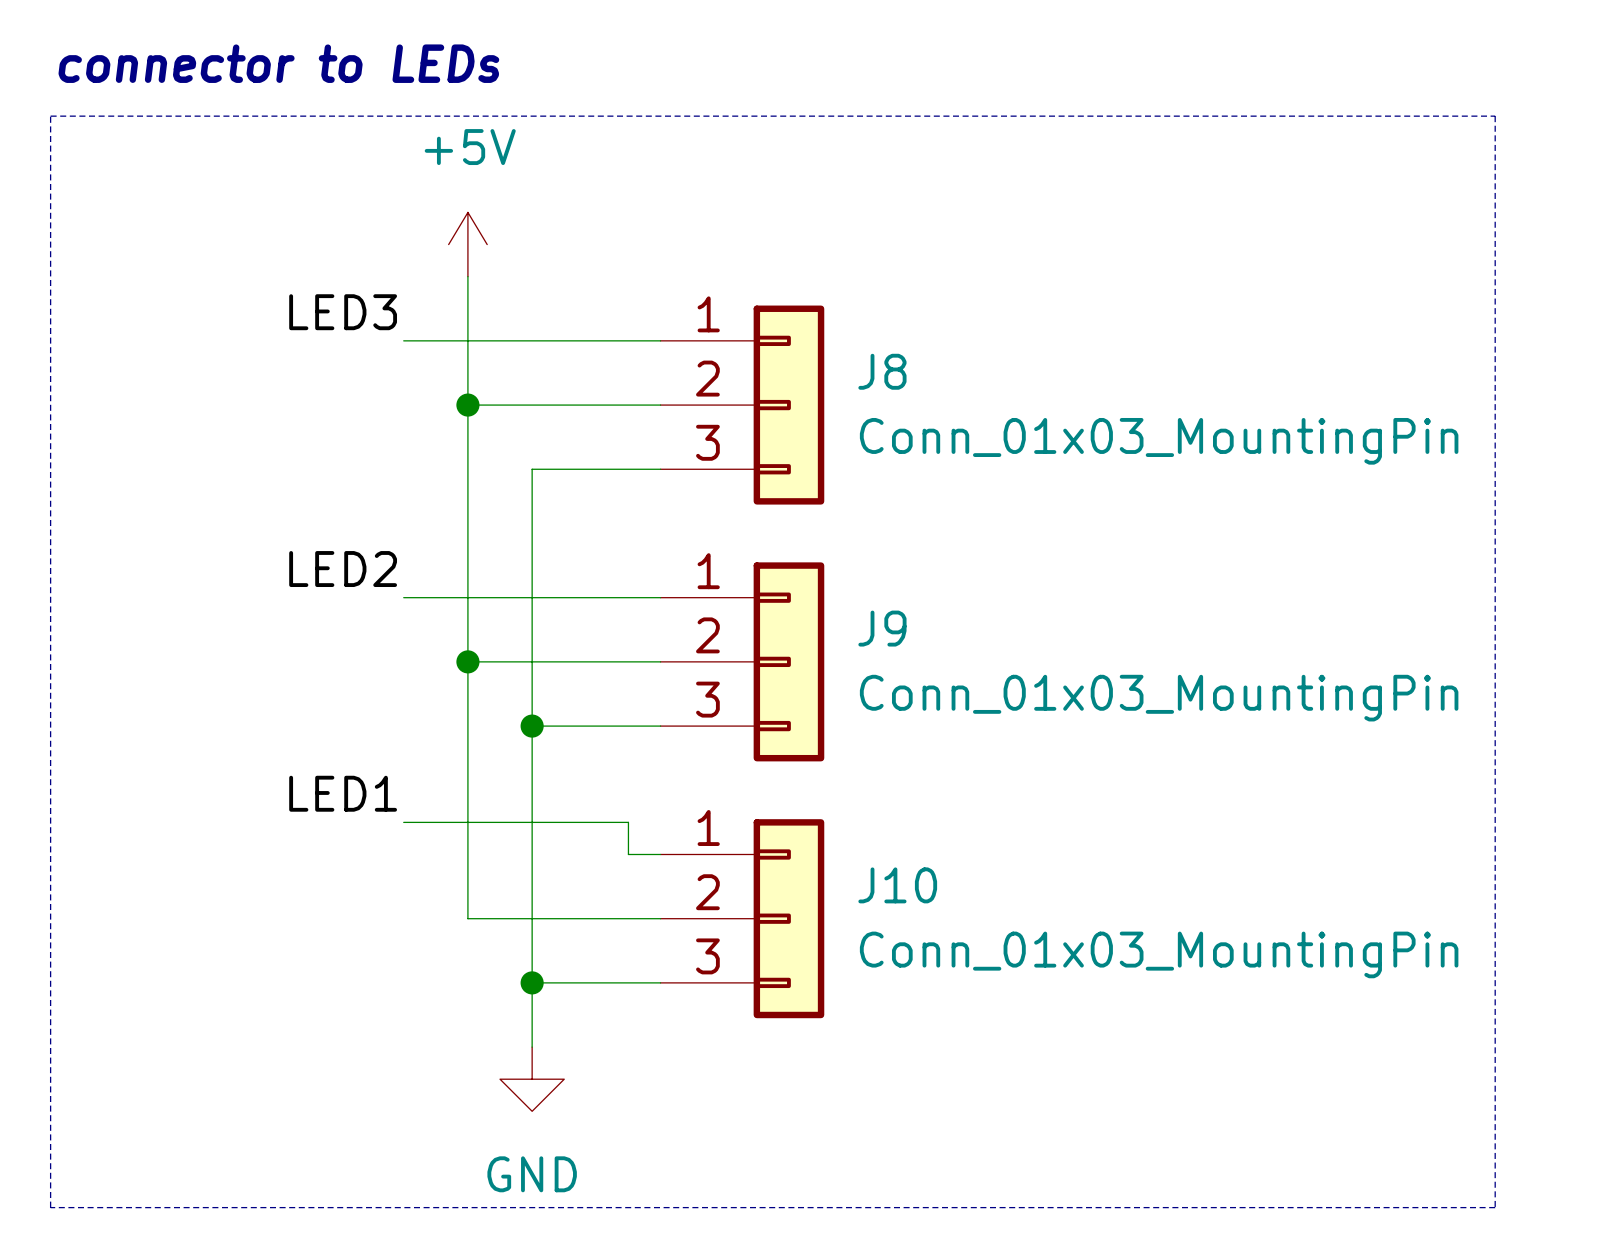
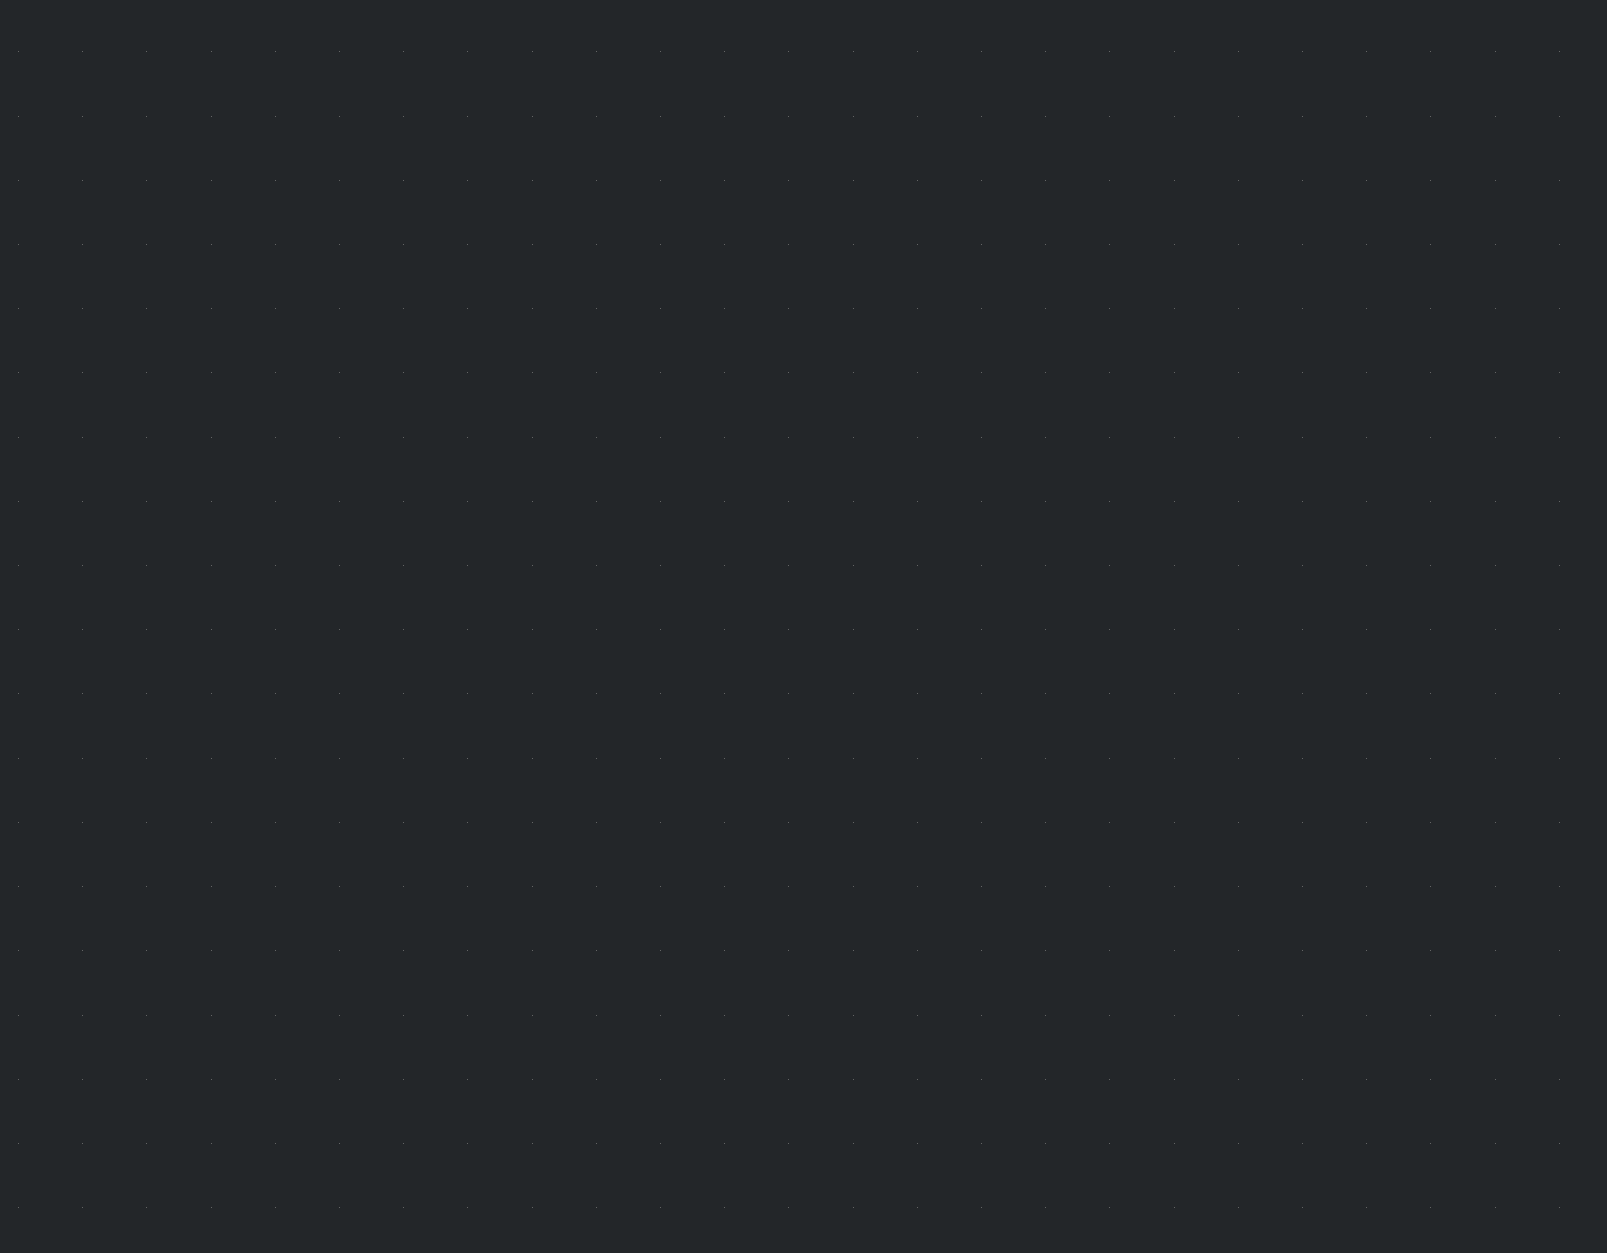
text: connector to LEDs (278, 63) -> none
line: (50, 116) (1495, 116) (1495, 1207) (50, 1207) (50, 116) -> none
power symbol: +5V (467, 244) -> none
wire: (467, 276) (467, 918) (660, 918) -> none
label: LED3 (343, 312) -> none
wire: (403, 340) (660, 340) -> none
wire: (467, 405) (660, 405) -> none
junction: (467, 405) -> none
J8: Conn_01x03_MountingPin (742, 405) -> none
wire: (660, 469) (532, 469) (532, 1047) -> none
label: LED2 (343, 569) -> none
wire: (403, 597) (660, 597) -> none
wire: (467, 661) (660, 661) -> none
junction: (467, 661) -> none
J9: Conn_01x03_MountingPin (742, 661) -> none
wire: (532, 726) (660, 726) -> none
junction: (532, 726) -> none
label: LED1 (343, 793) -> none
wire: (403, 822) (628, 822) (628, 854) (660, 854) -> none
J10: Conn_01x03_MountingPin (742, 918) -> none
wire: (532, 982) (660, 982) -> none
junction: (532, 982) -> none
power symbol: GND (532, 1079) -> none

